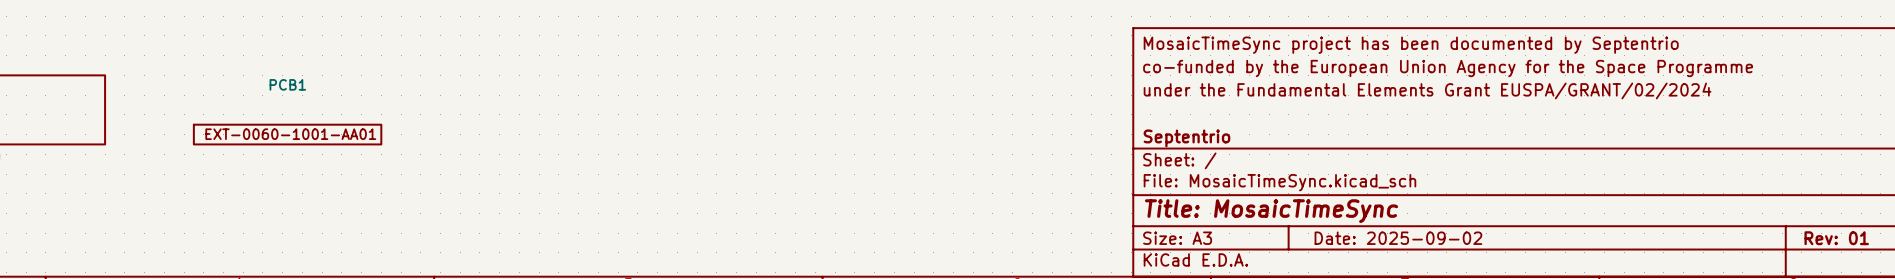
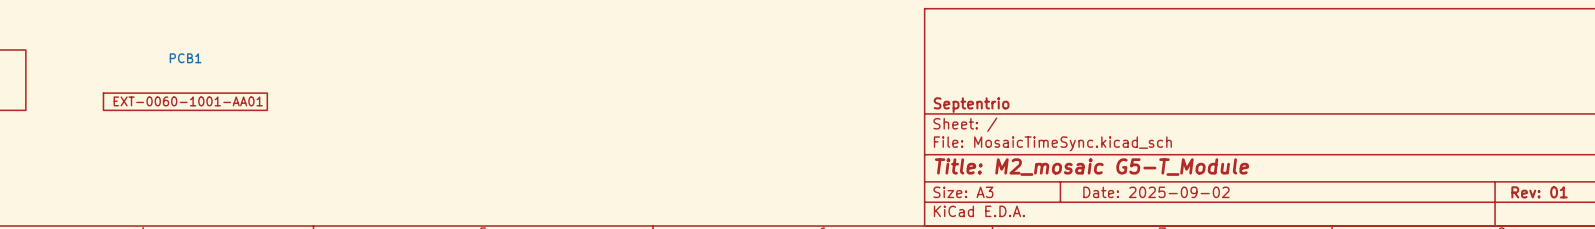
title block: MosaicTimeSync project has been documented by Septentrio (1411, 45) -> none
title block: co-funded by the European Union Agency for the Space Programme (1448, 68) -> none
title block: under the Fundamental Elements Grant EUSPA/GRANT/02/2024 (1427, 90) -> none
title block: Title: MosaicTimeSync (1271, 211) -> Title: M2_mosaic G5-T_Module (1091, 167)

